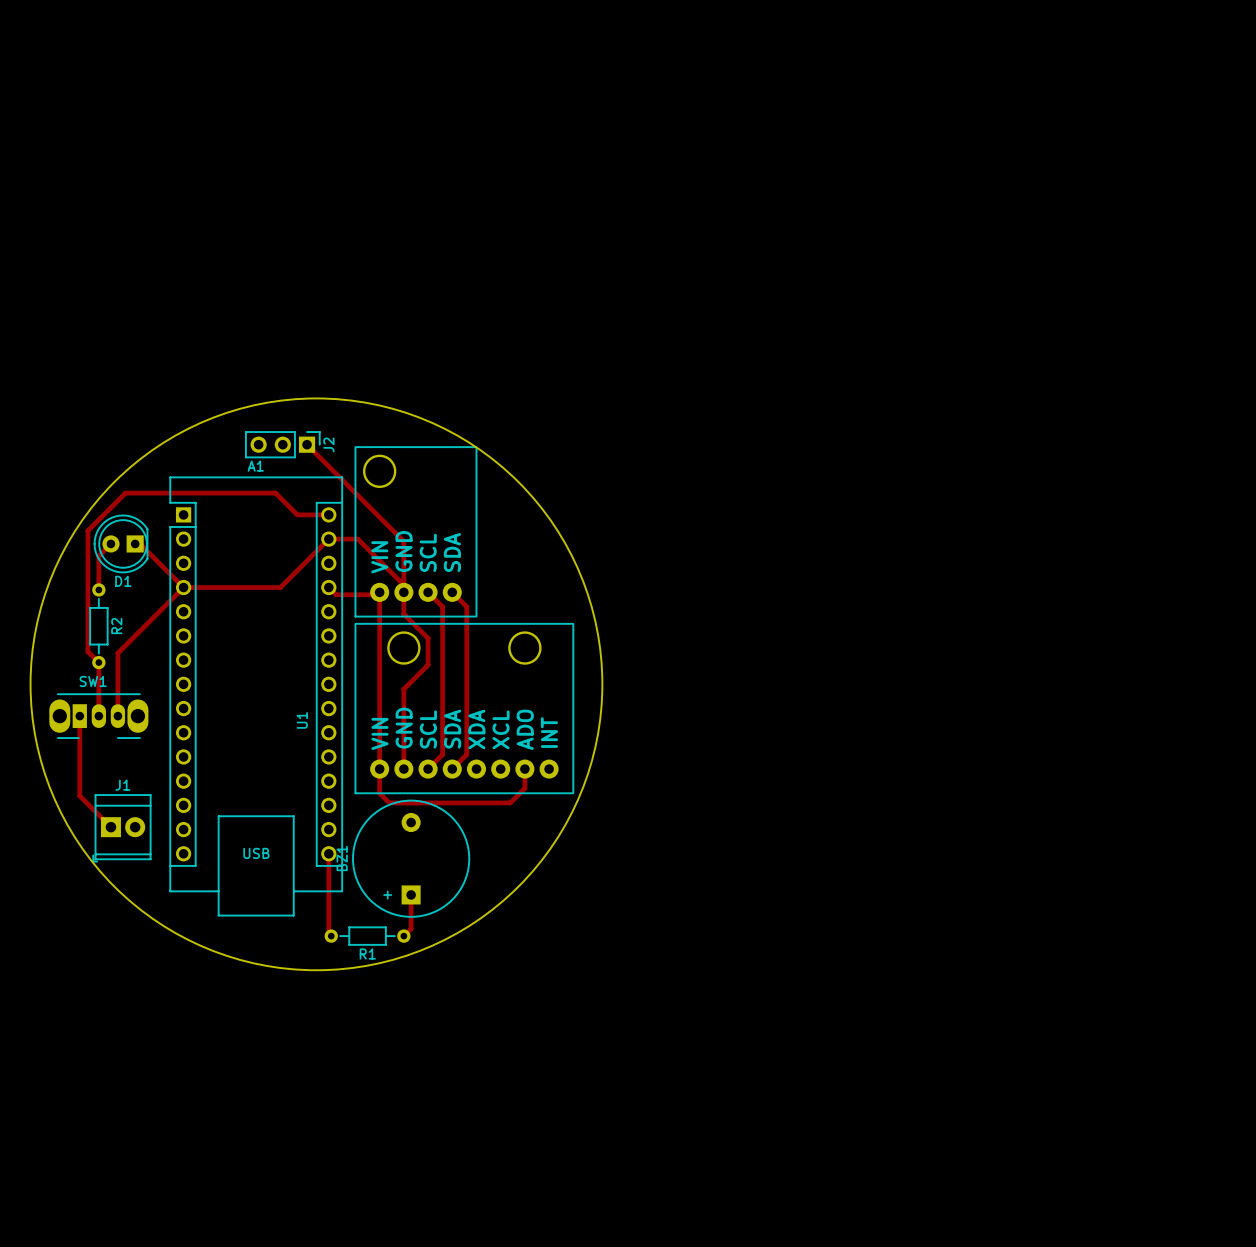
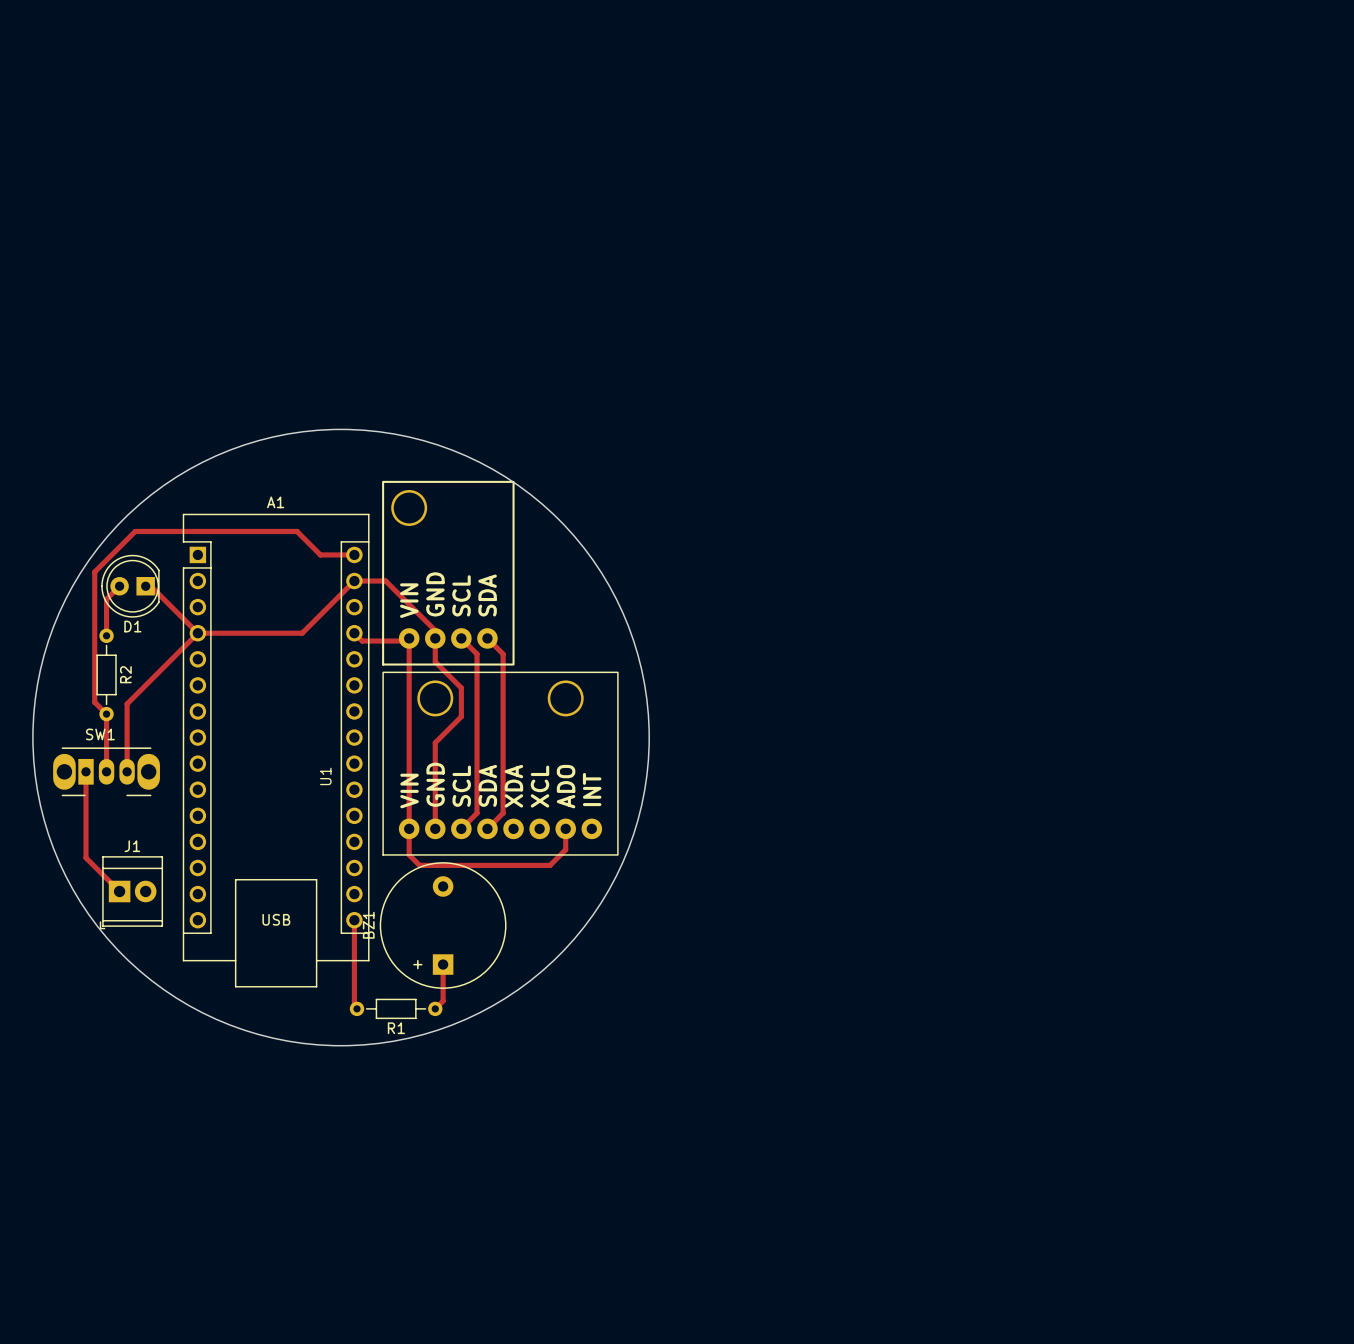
J2: (282, 444) -> none
track: (307, 444) (403, 541) (403, 585) -> none

